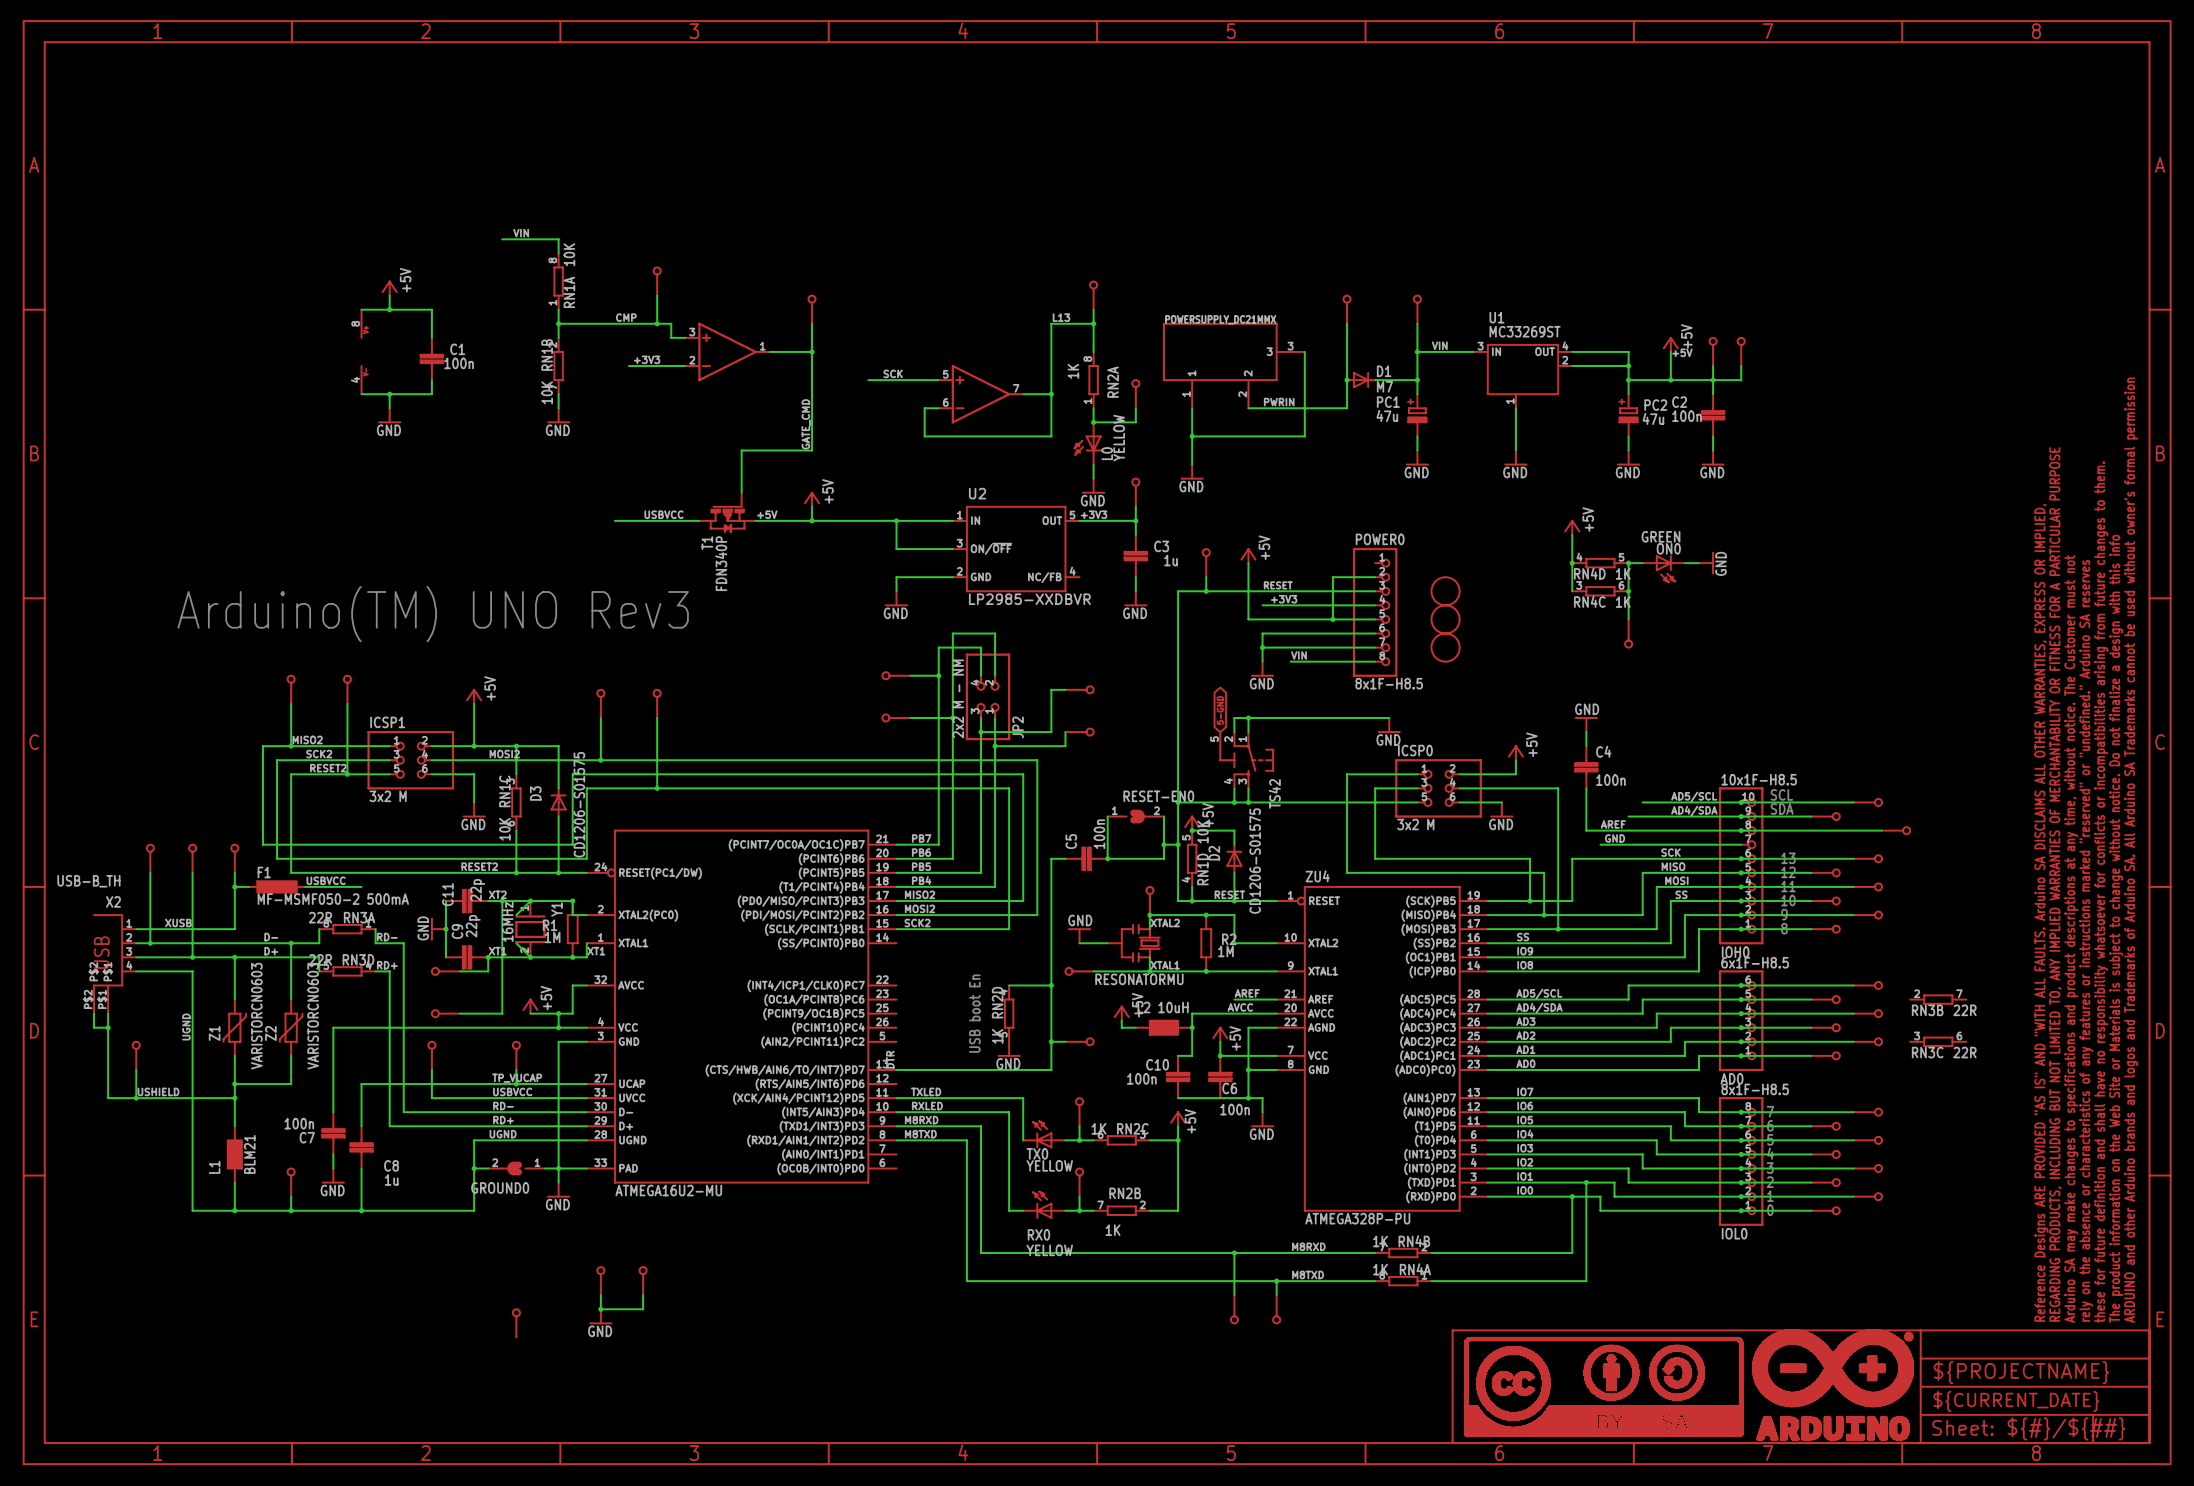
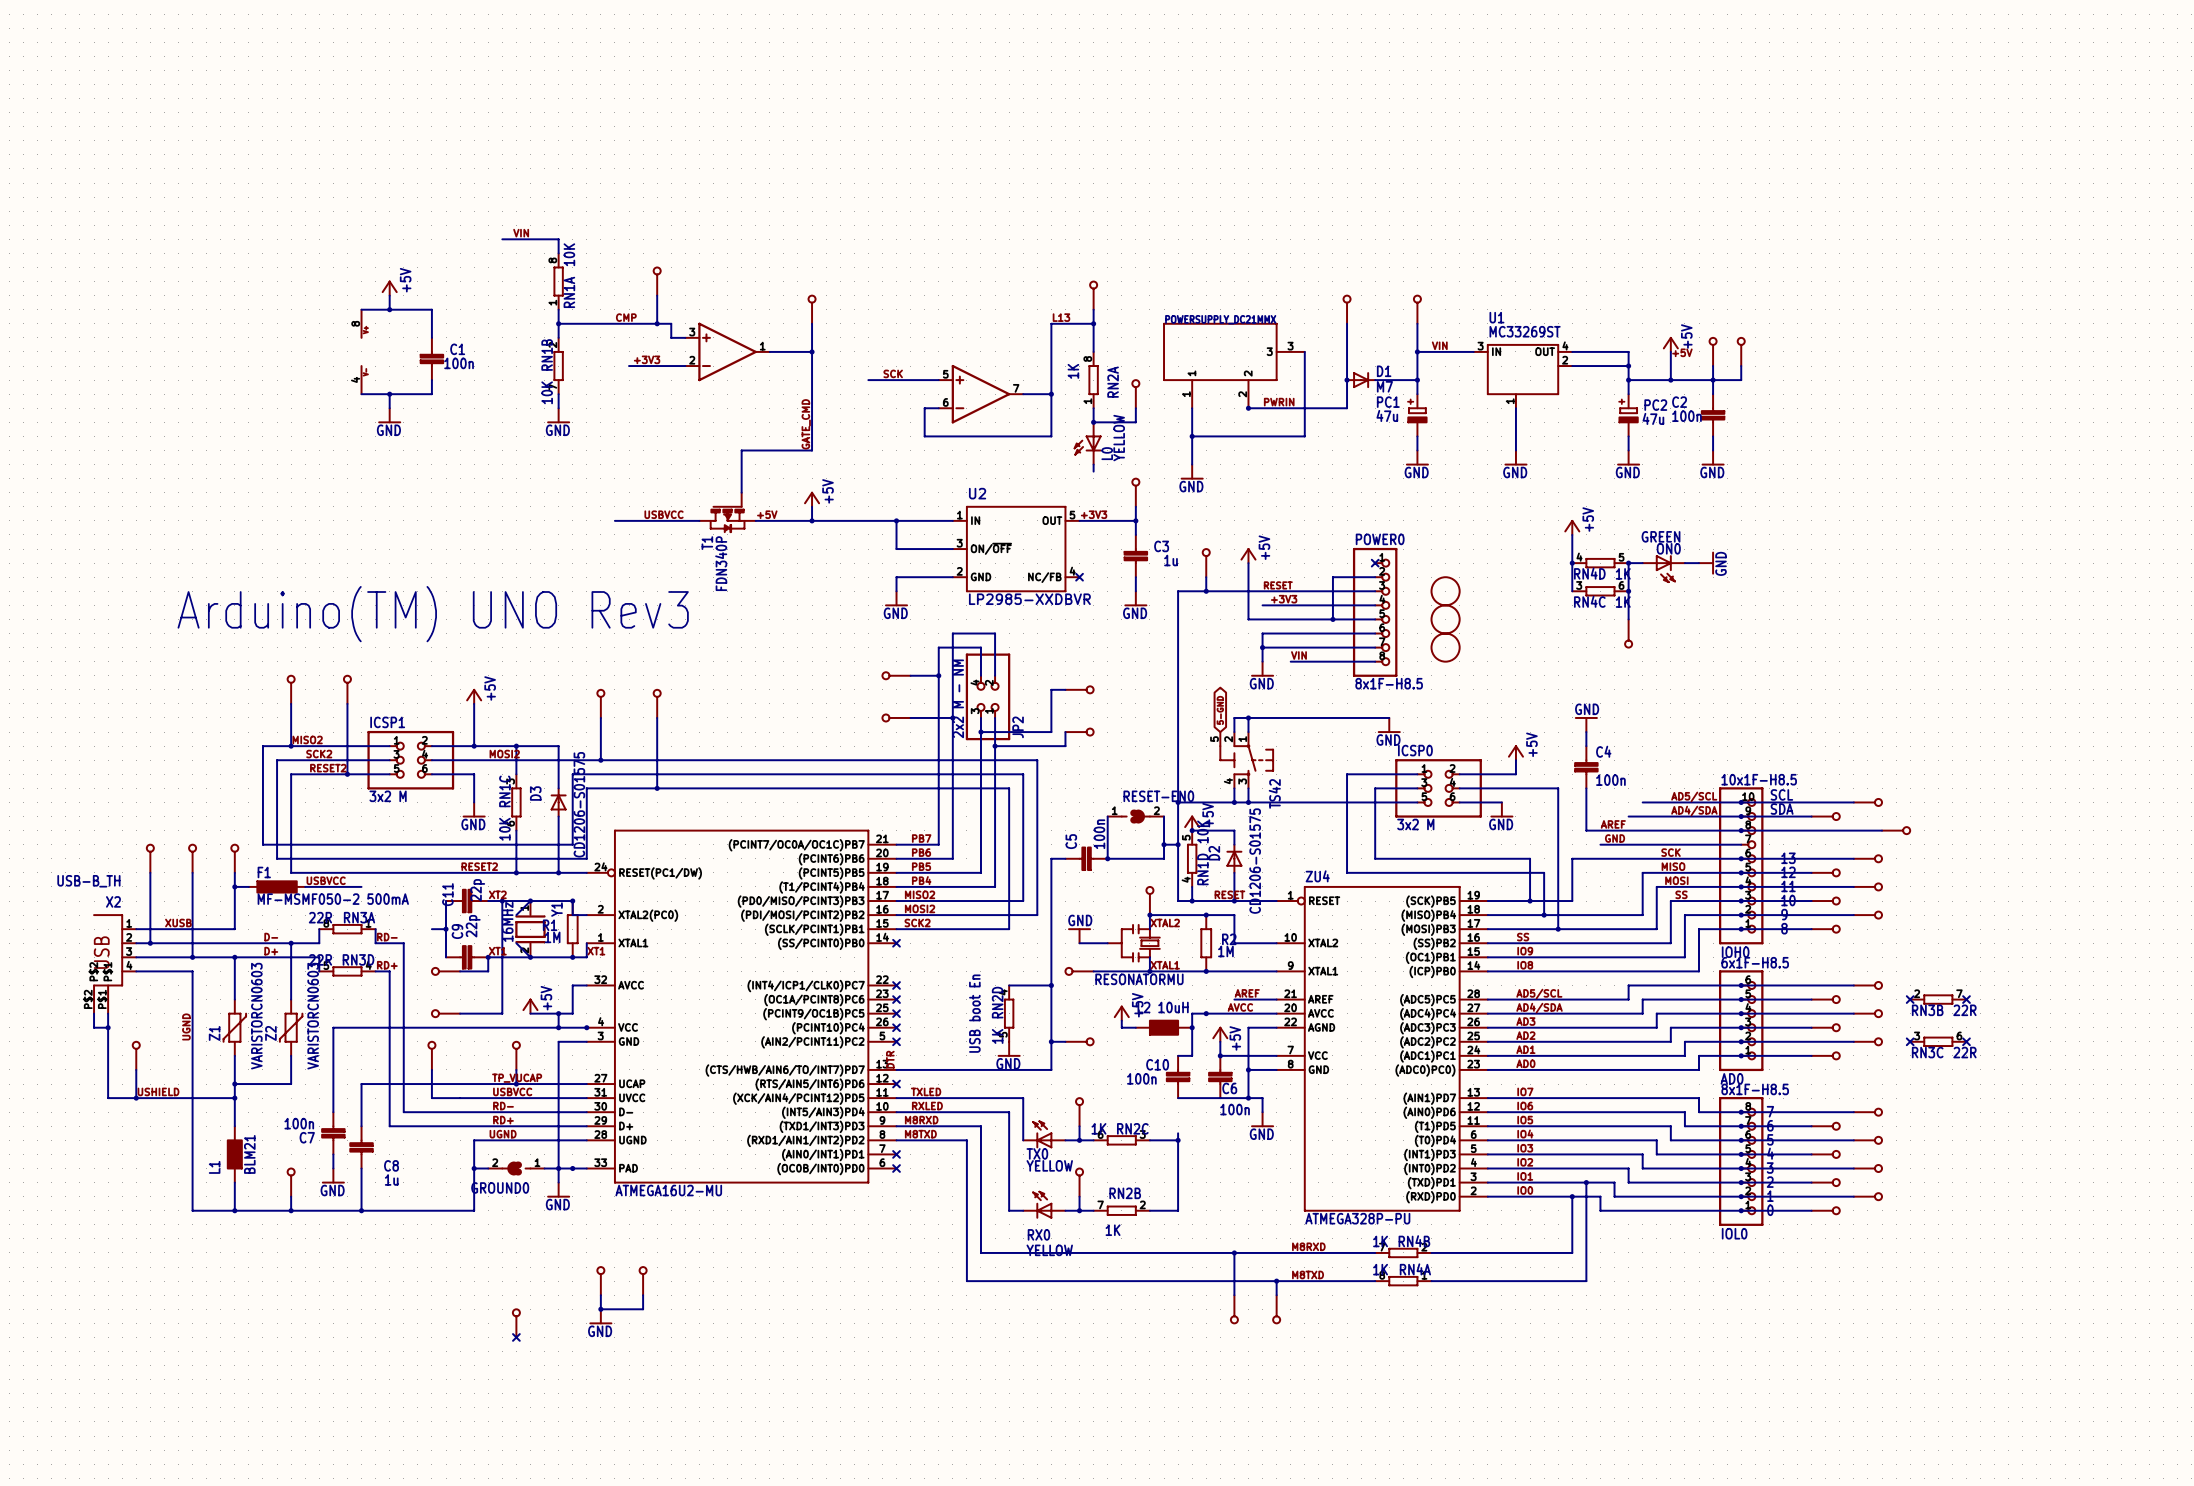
junction: none -> (1248, 408)
wire: (1093, 471) (1093, 478) -> none
power symbol: GND (1093, 486) -> none
no-connect mark: none -> (1375, 563)
no-connect mark: none -> (1079, 577)
part: (1097, 742) -> none
power symbol: GND (438, 929) -> none
no-connect mark: none -> (896, 943)
no-connect mark: none -> (896, 985)
no-connect mark: none -> (896, 999)
no-connect mark: none -> (1910, 999)
no-connect mark: none -> (1966, 999)
no-connect mark: none -> (896, 1013)
junction: none -> (1206, 1013)
junction: none -> (586, 1027)
no-connect mark: none -> (896, 1027)
no-connect mark: none -> (896, 1041)
no-connect mark: none -> (1910, 1041)
no-connect mark: none -> (1966, 1041)
no-connect mark: none -> (896, 1084)
power symbol: +5V (1178, 1118) -> none
wire: (1178, 1126) (1178, 1133) -> none
no-connect mark: none -> (896, 1154)
junction: none -> (572, 1168)
no-connect mark: none -> (896, 1168)
no-connect mark: none -> (516, 1337)

